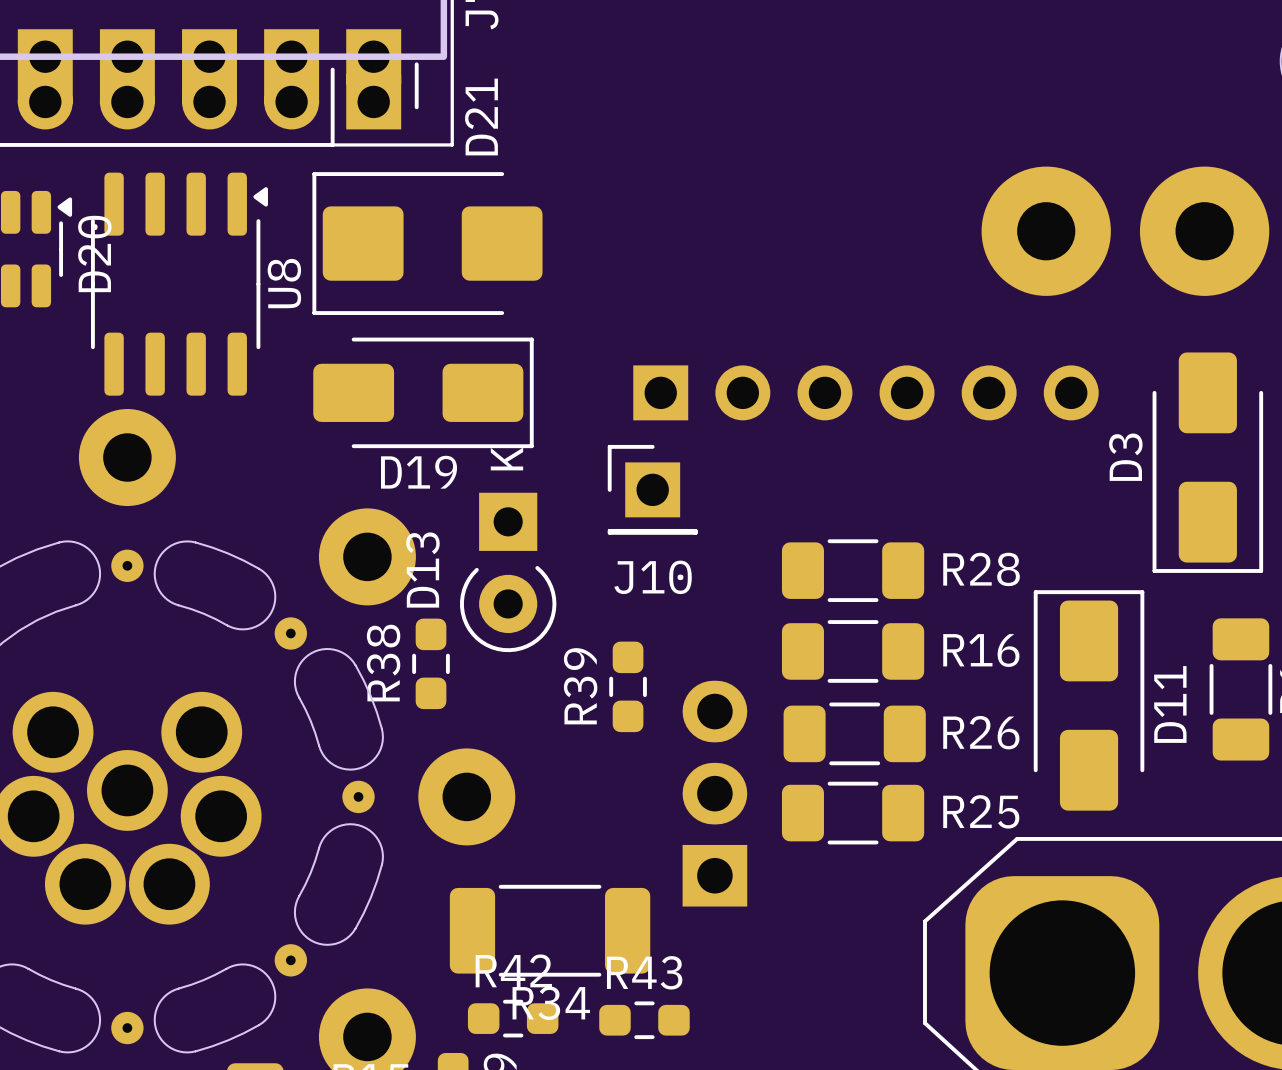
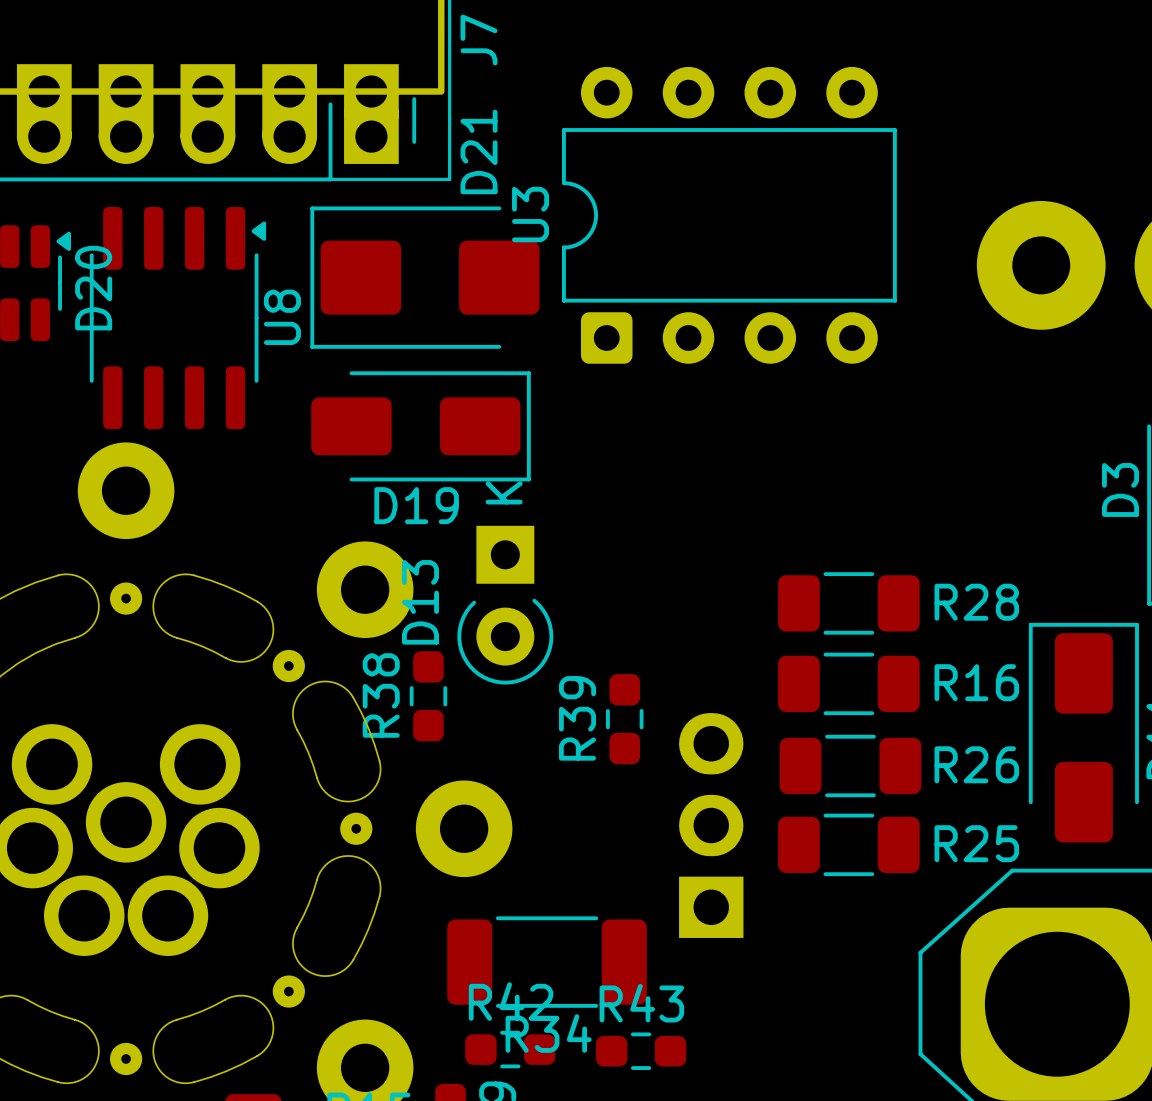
U3: none -> (729, 215)
part: (866, 392) -> none
J10: (652, 489) -> none

